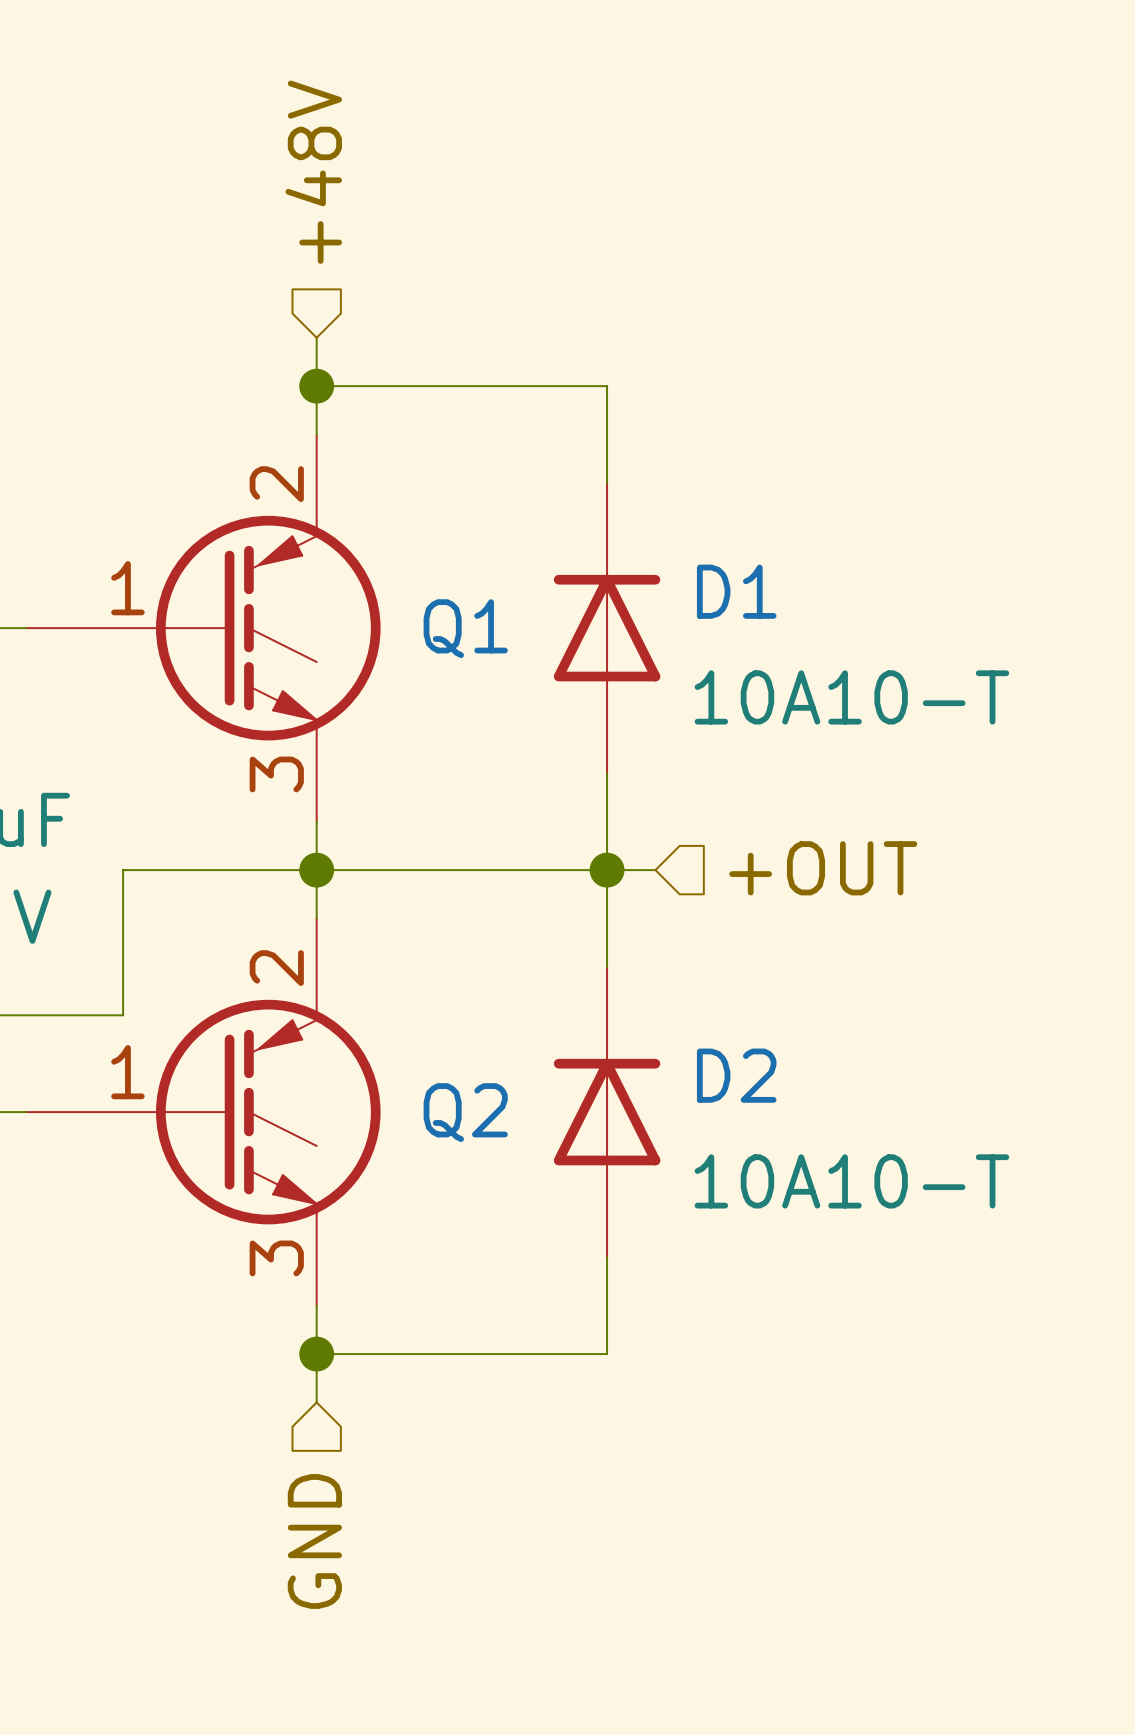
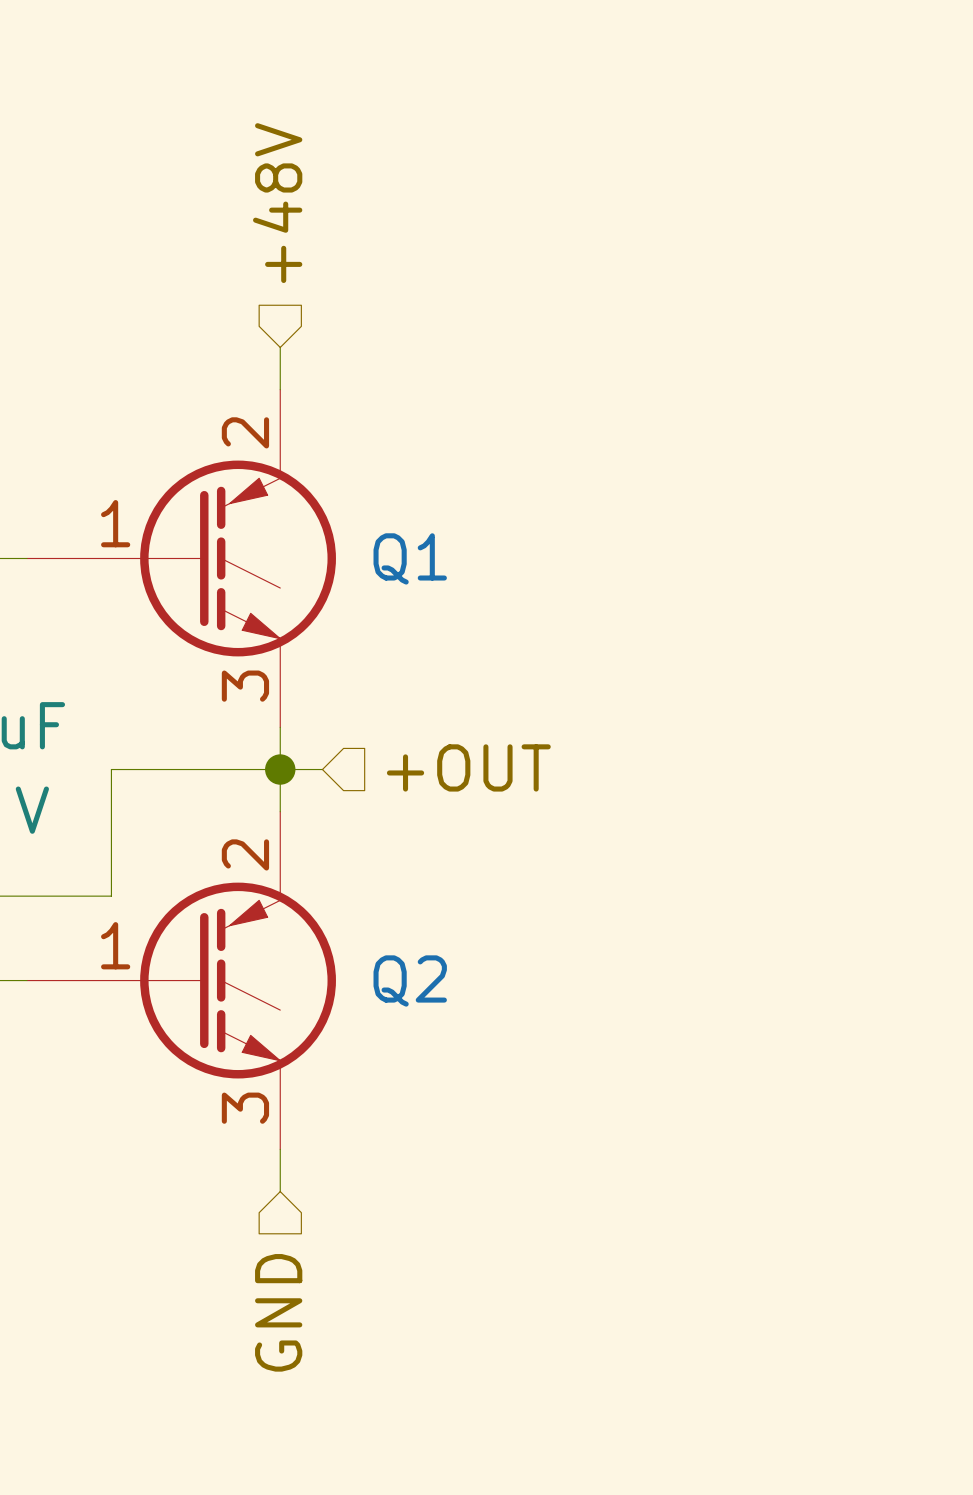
hierarchical label position: +48V (313, 172) -> +48V (277, 203)
wire: (316, 337) (316, 386) (607, 386) (607, 482) -> none
junction: (316, 386) -> none
D1: 10A10-T (607, 628) -> none
wire: (607, 773) (607, 966) -> none
hierarchical label position: +OUT (823, 868) -> +OUT (468, 767)
wire: (365, 870) (655, 870) -> none
junction: (607, 870) -> none
D2: 10A10-T (607, 1112) -> none
wire: (607, 1257) (607, 1354) (316, 1354) (316, 1402) -> none
junction: (316, 1354) -> none
hierarchical label position: GND (314, 1541) -> GND (278, 1312)

